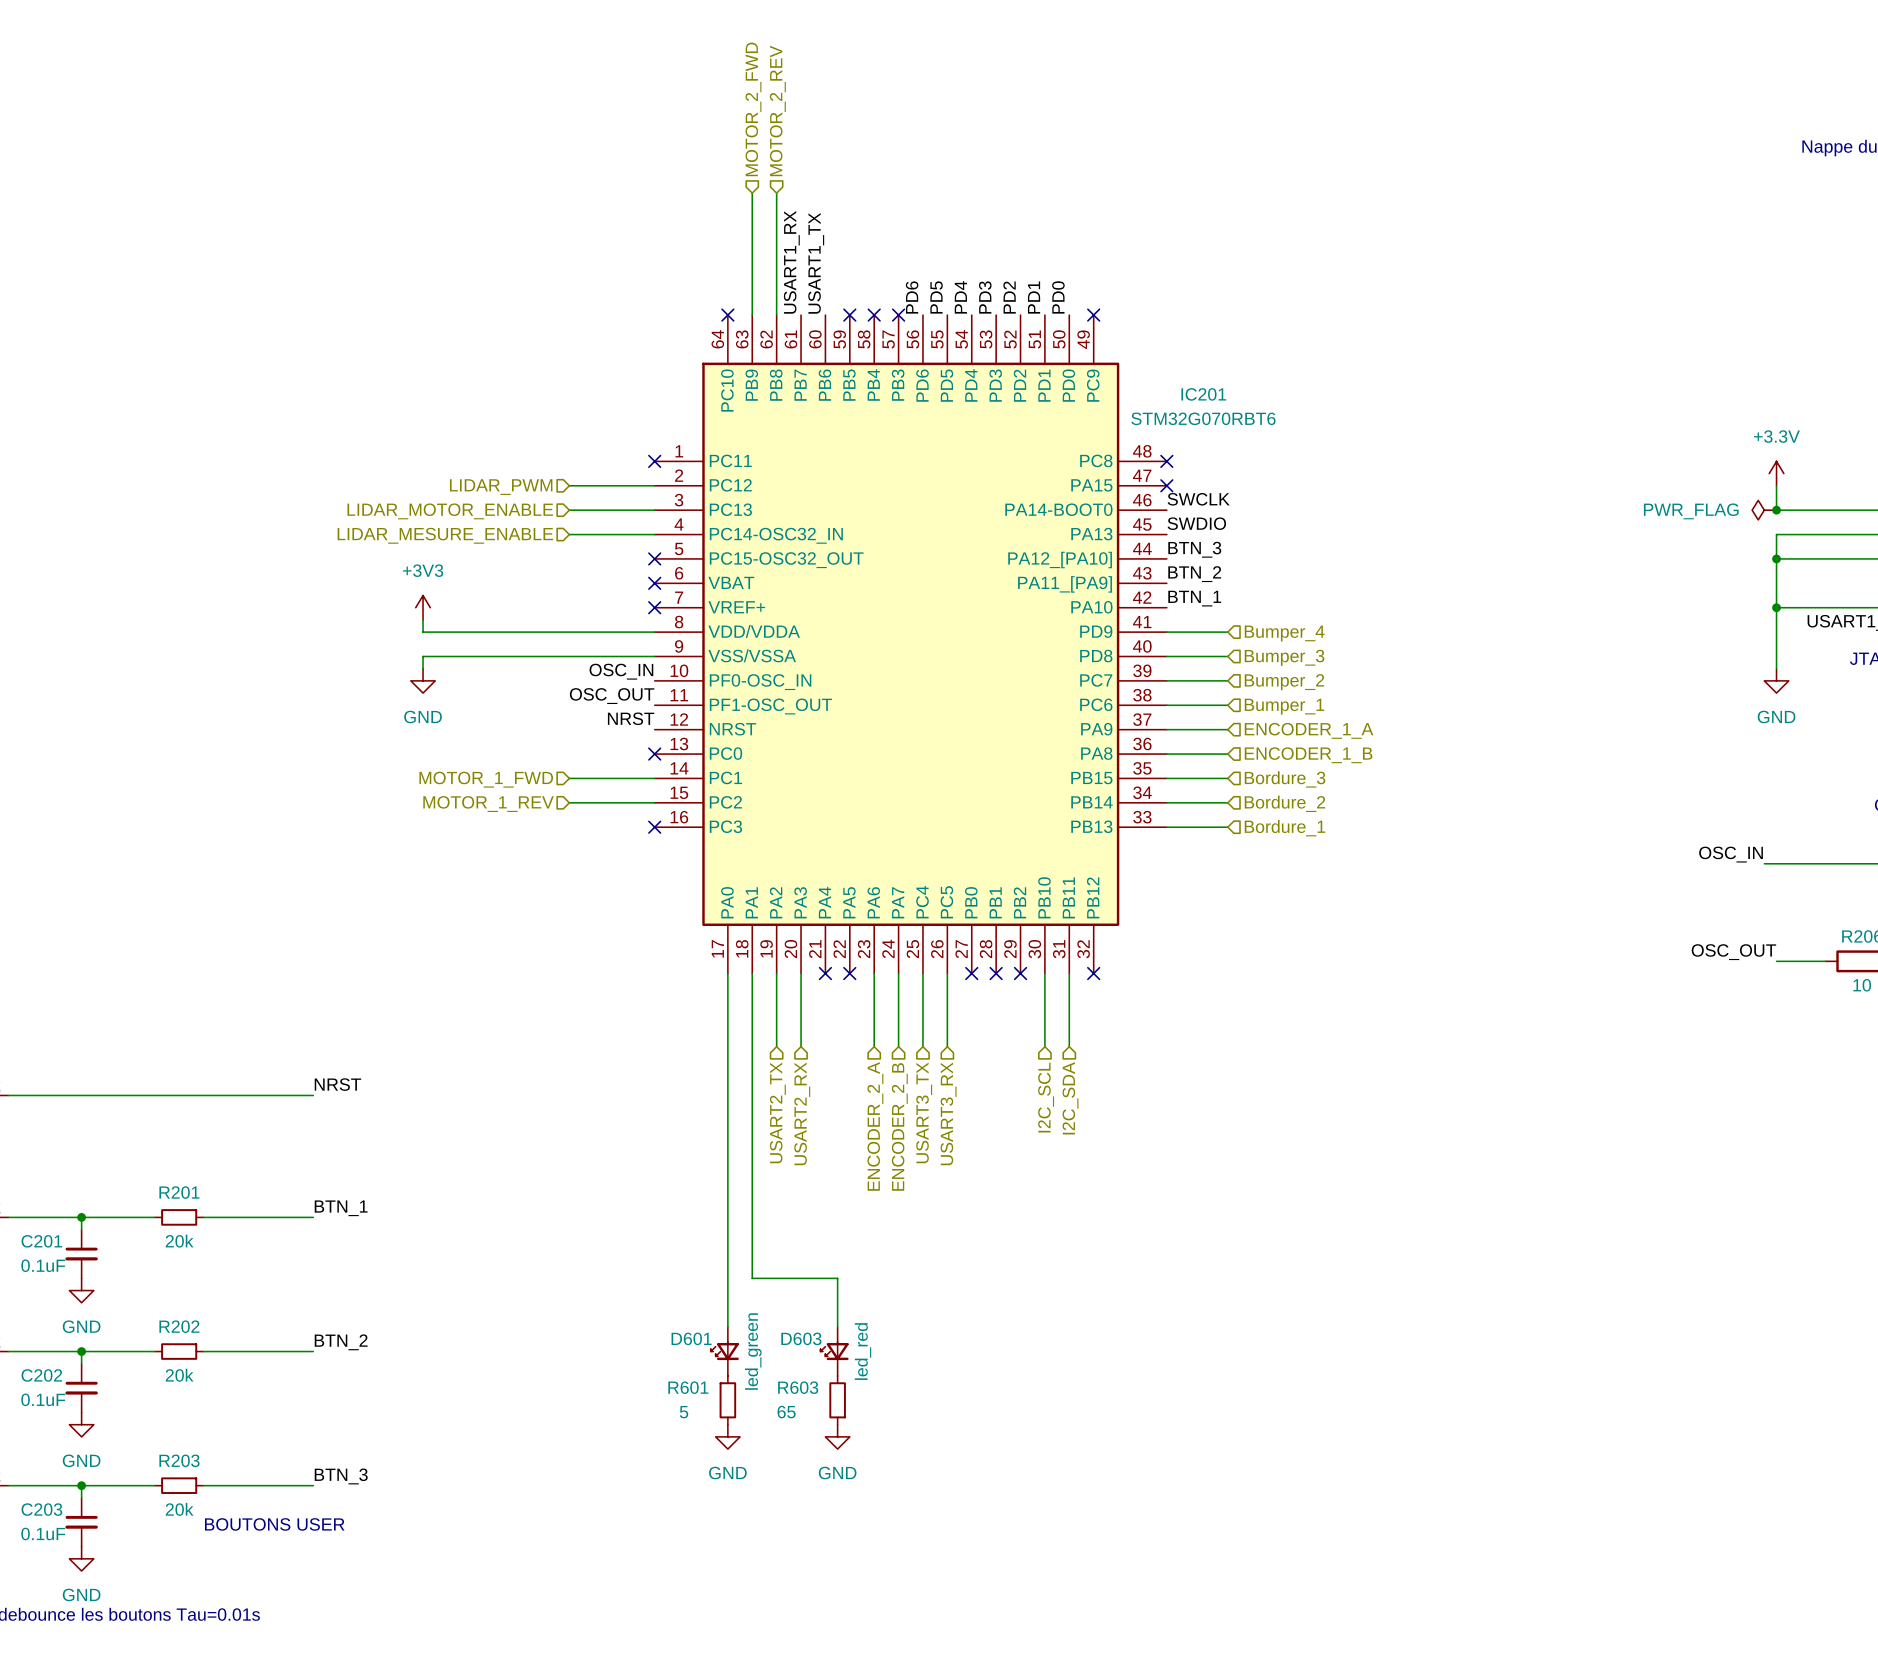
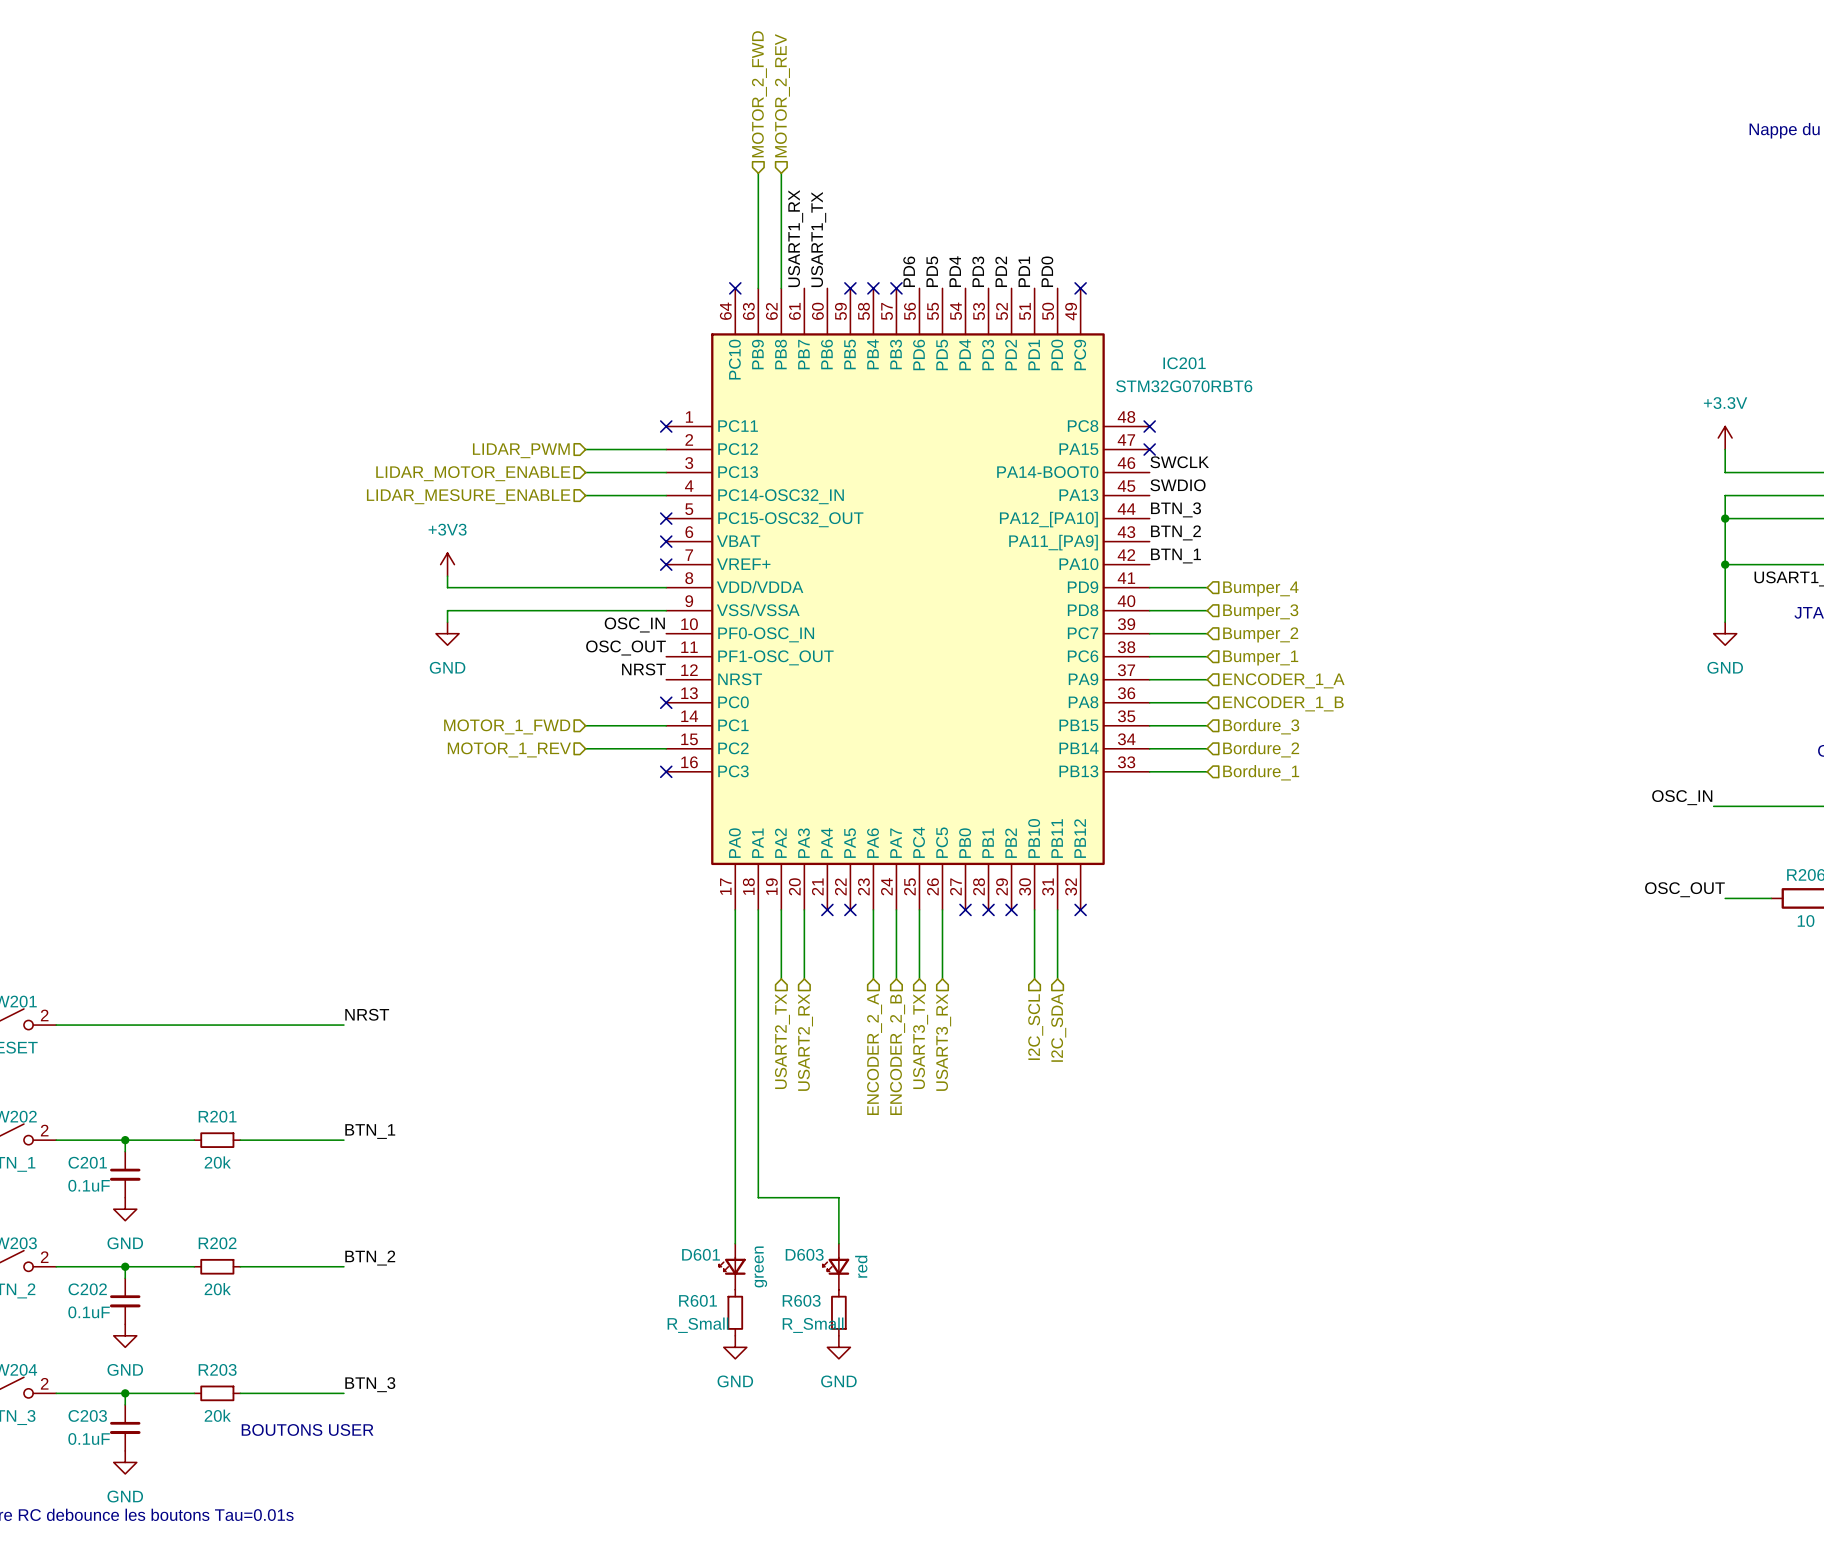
power symbol: PWR_FLAG (1764, 510) -> none
junction: (1776, 510) -> none
D601 value: led_green (753, 1351) -> green (760, 1266)
D603 value: led_red (862, 1351) -> red (861, 1266)
R601 value: 5 (684, 1412) -> R_Small (697, 1325)
R603 value: 65 (786, 1412) -> R_Small (813, 1325)

